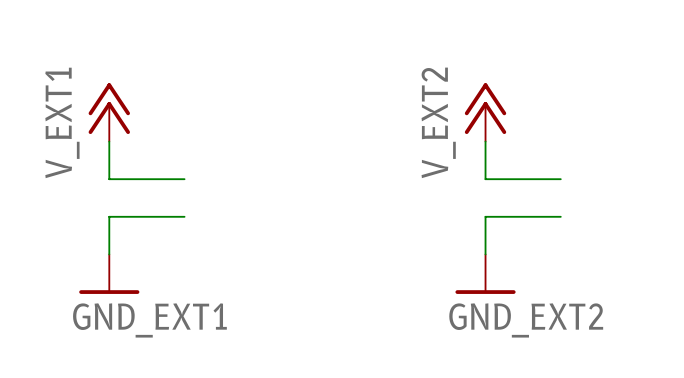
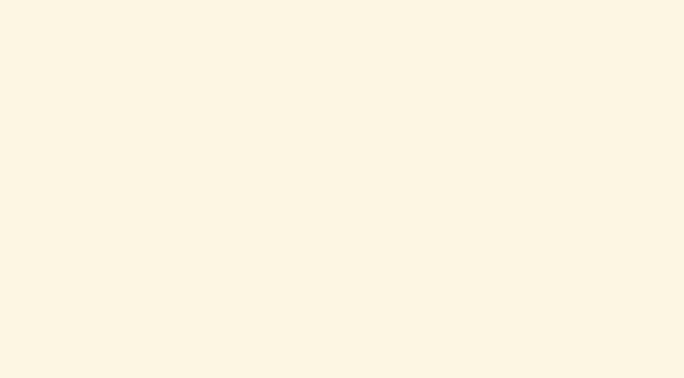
power symbol: V_EXT1 (109, 112) -> none
power symbol: V_EXT2 (485, 112) -> none
wire: (109, 141) (109, 179) (184, 179) -> none
wire: (485, 141) (485, 179) (560, 179) -> none
wire: (184, 216) (109, 216) (109, 254) -> none
wire: (560, 216) (485, 216) (485, 254) -> none
power symbol: GND_EXT1 (109, 274) -> none
power symbol: GND_EXT2 (485, 274) -> none

